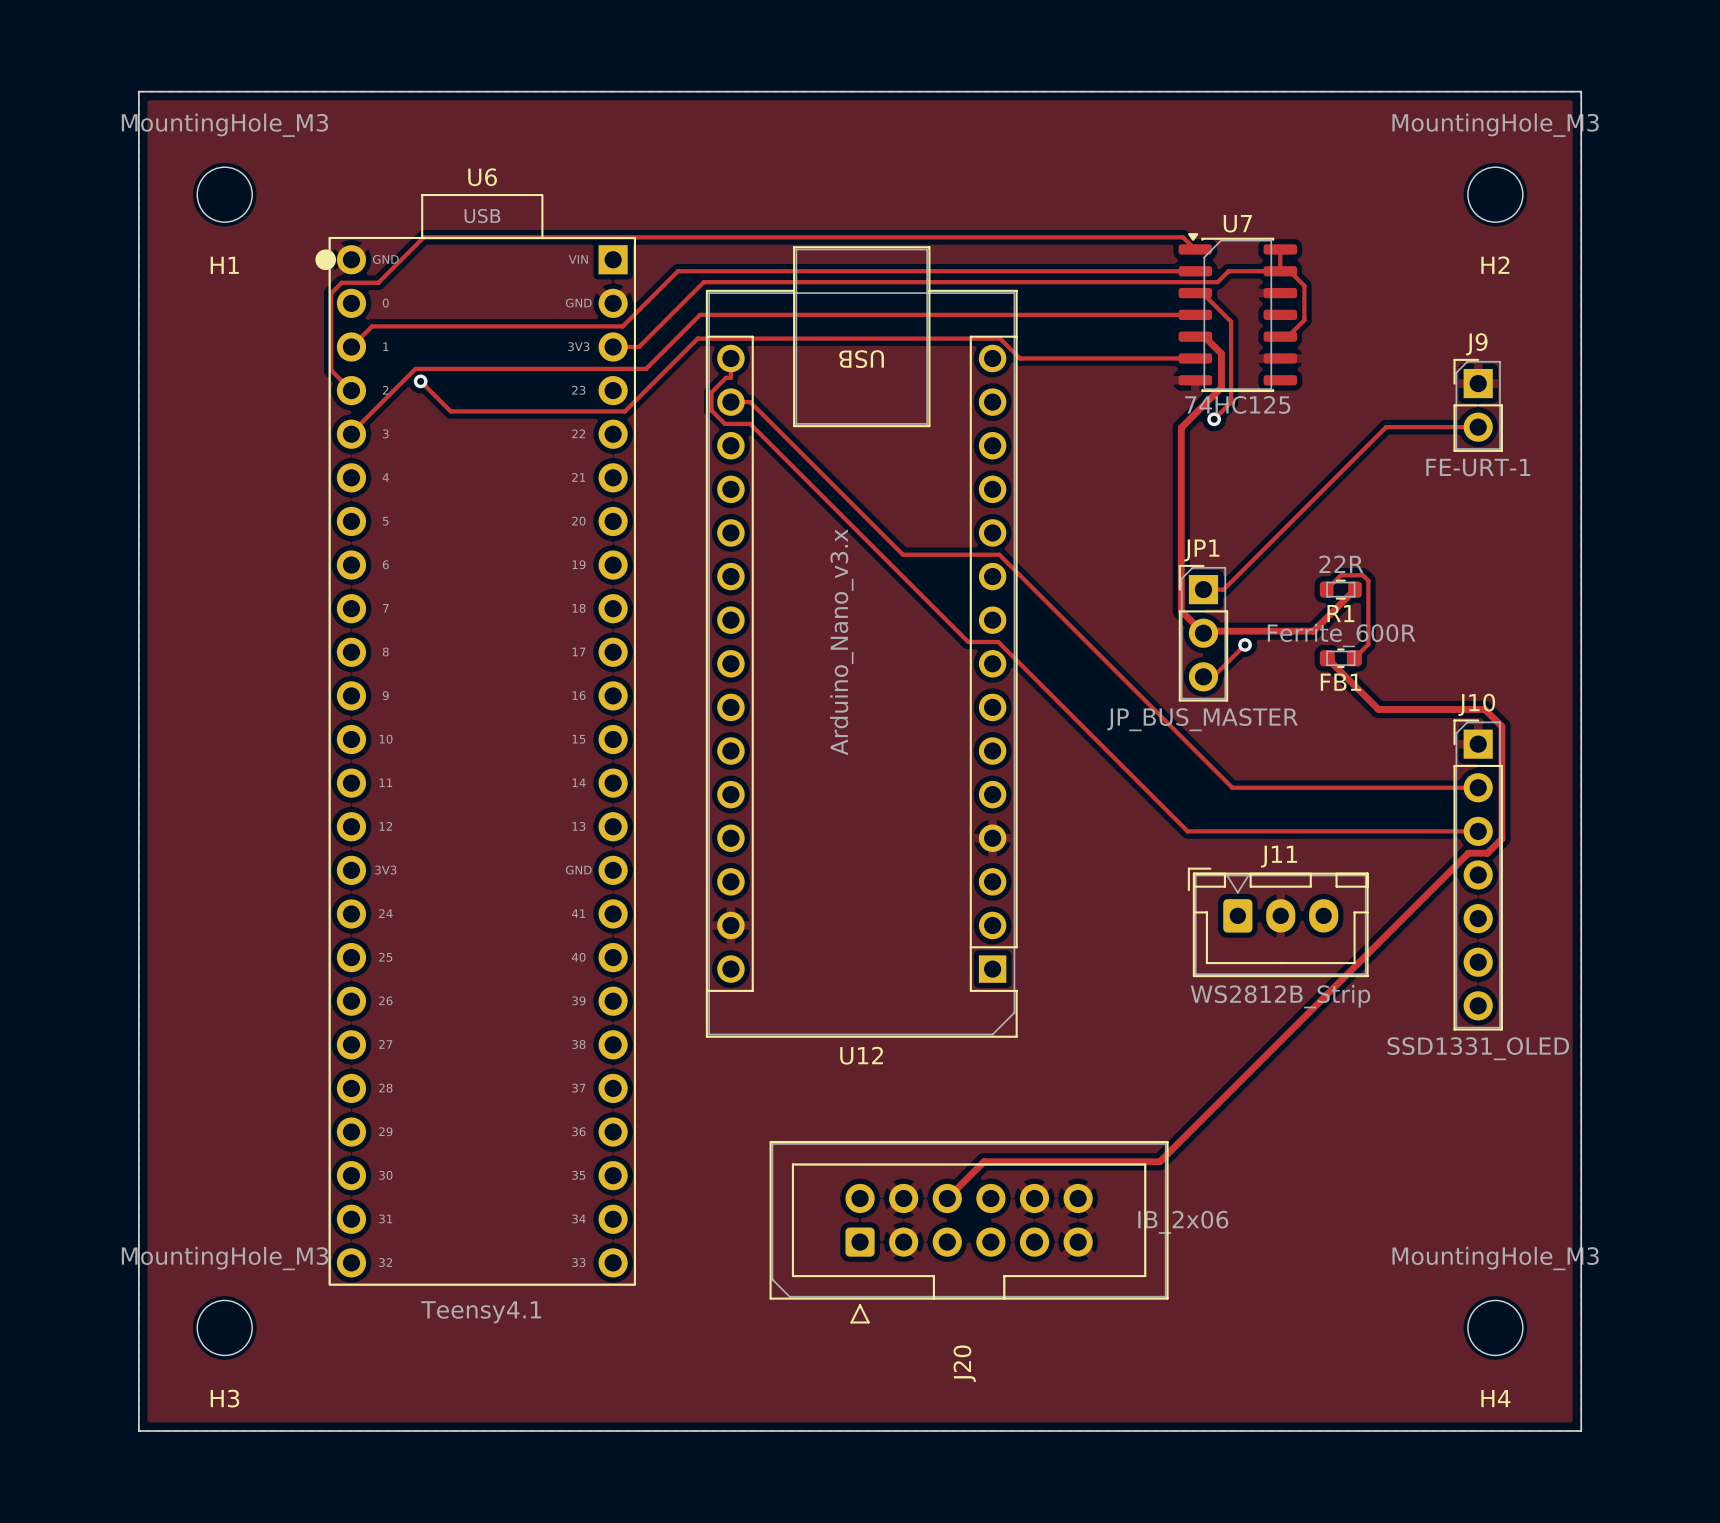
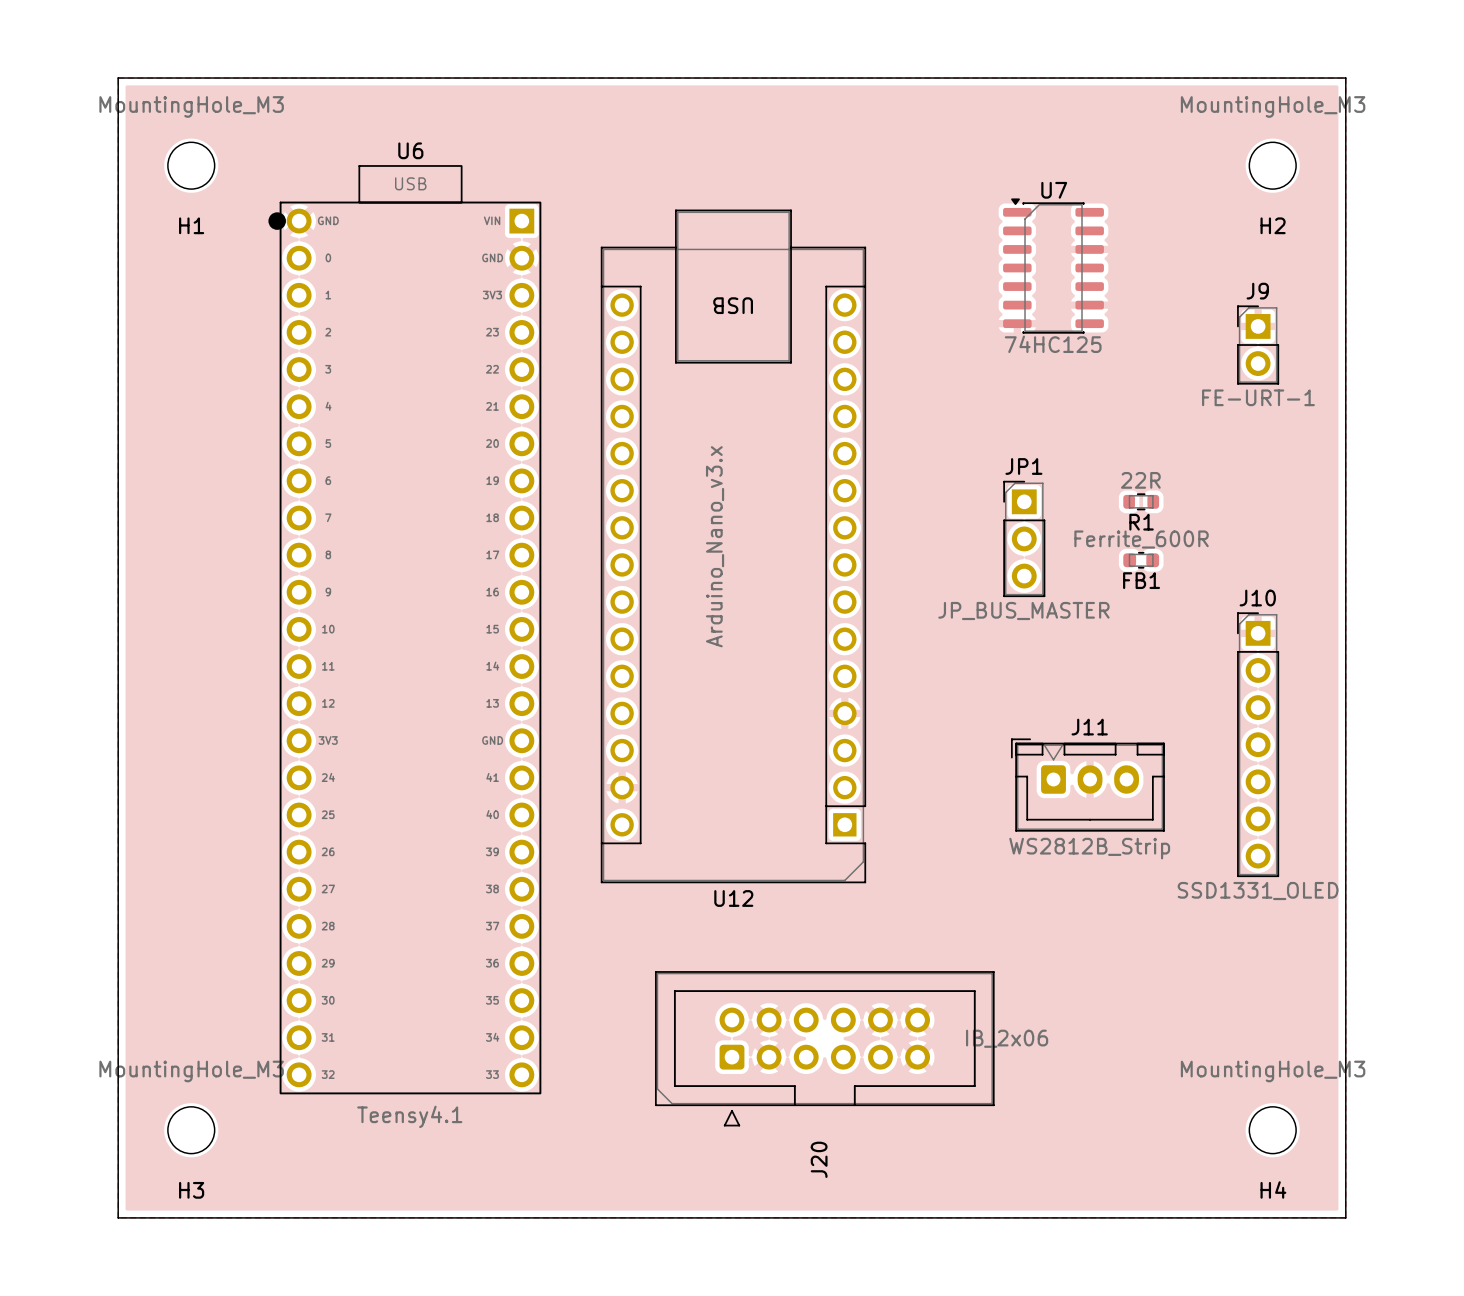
track: (1195, 249) (1183, 237) (423, 237) (378, 282) (341, 282) (331, 293) (331, 370) (351, 390) -> none
track: (1280, 249) (1280, 271) -> none
track: (1195, 271) (677, 271) (622, 326) (372, 326) (351, 346) -> none
track: (1195, 293) (1202, 293) (1231, 321) (1231, 402) (1214, 419) -> none
track: (1195, 314) (700, 314) (646, 368) (415, 368) (351, 434) -> none
track: (1195, 336) (1204, 336) (1221, 353) (1221, 387) (1181, 427) (1181, 611) (1203, 633) (1205, 631) (1313, 631) (1355, 589) -> none
track: (1280, 336) (1287, 336) (1304, 320) (1304, 285) (1289, 271) (1228, 271) (1217, 282) (703, 282) (638, 346) (613, 346) -> none
track: (730, 358) (730, 377) (726, 377) (711, 392) (711, 410) (724, 423) (750, 423) (968, 641) (998, 641) (1187, 831) (1478, 831) -> none
track: (1195, 358) (1019, 358) (1000, 338) (697, 338) (624, 411) (450, 411) (420, 381) -> none
via: (420, 381) -> none
track: (730, 402) (750, 402) (902, 554) (999, 554) (1232, 787) (1478, 787) -> none
via: (1214, 419) -> none
track: (1478, 427) (1386, 427) (1223, 589) (1203, 589) -> none
track: (1326, 589) (1340, 575) (1363, 575) (1368, 580) (1368, 644) (1354, 658) -> none
track: (1245, 644) (1213, 676) (1203, 676) -> none
via: (1245, 644) -> none
track: (1327, 658) (1378, 709) (1484, 709) (1501, 726) (1501, 838) (1487, 853) (1468, 853) (1159, 1161) (983, 1161) (947, 1198) -> none

